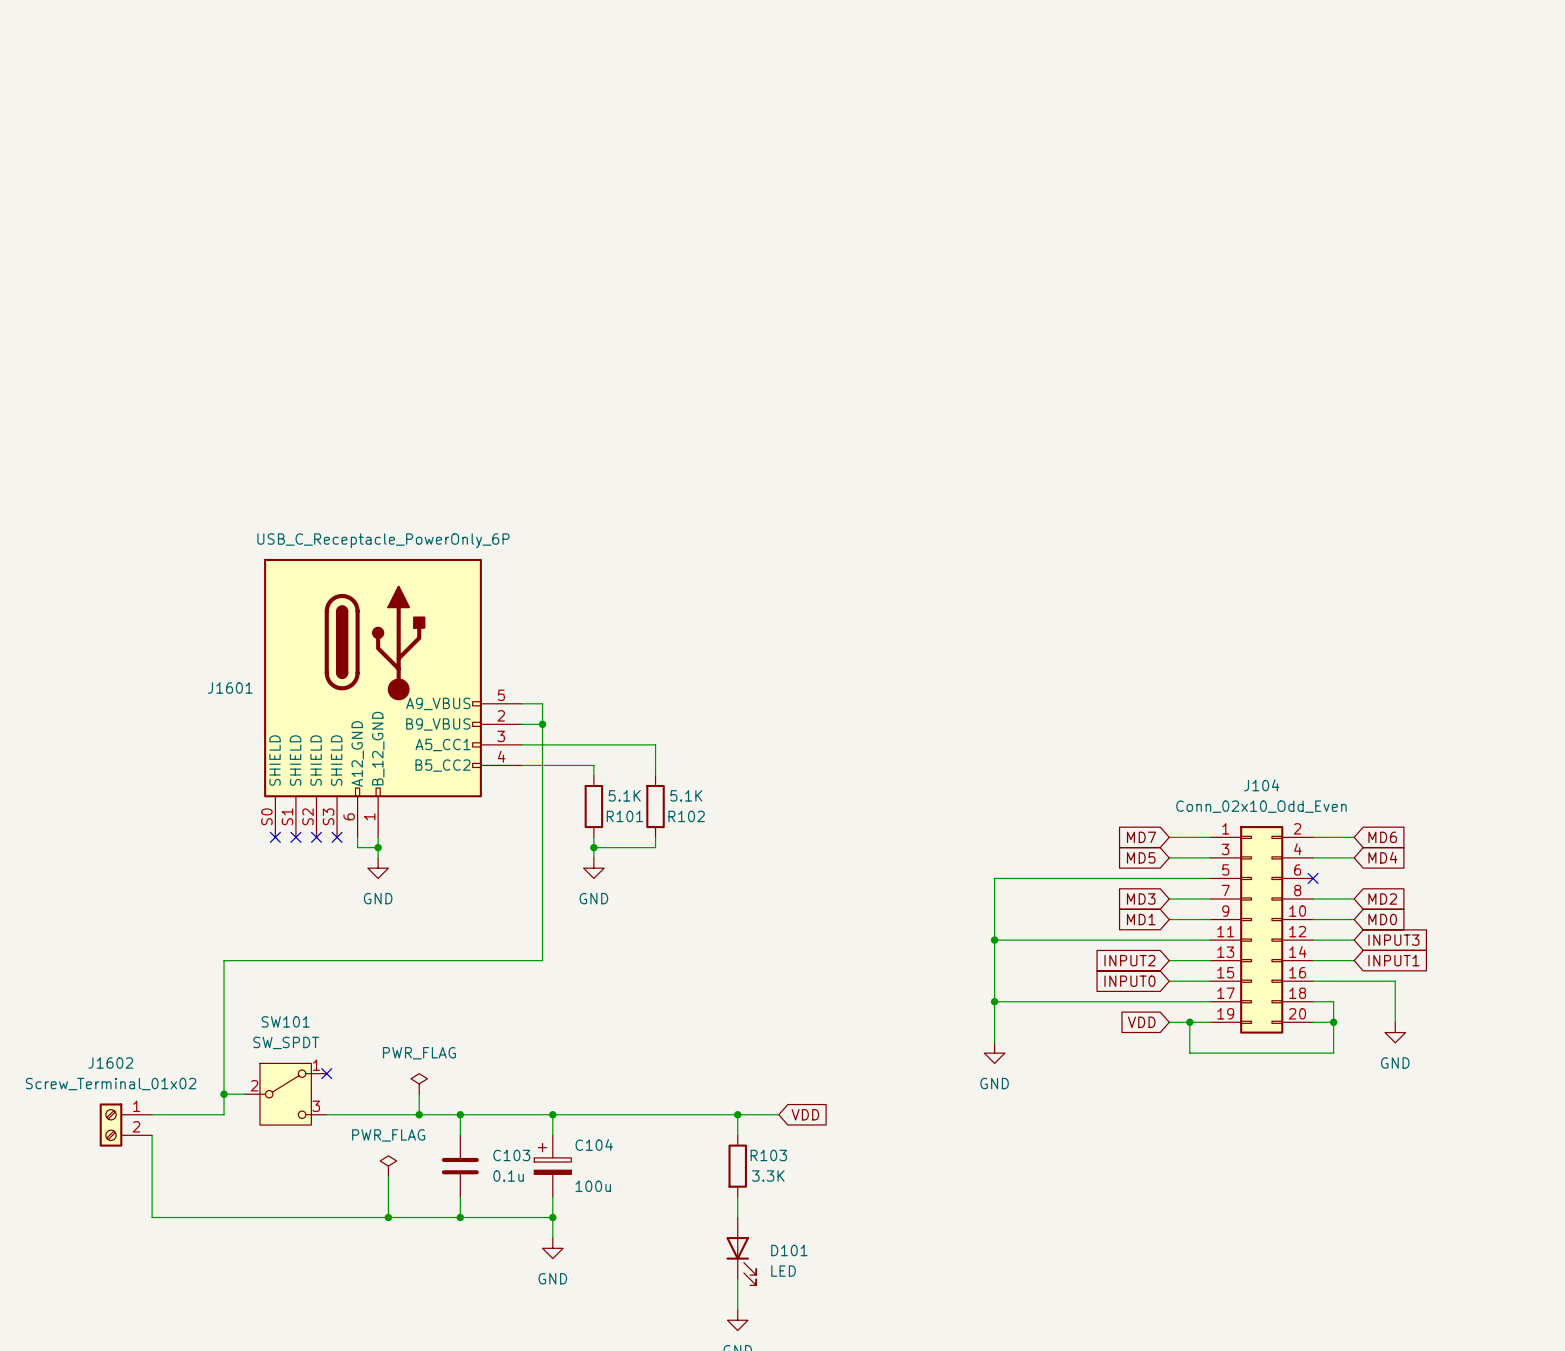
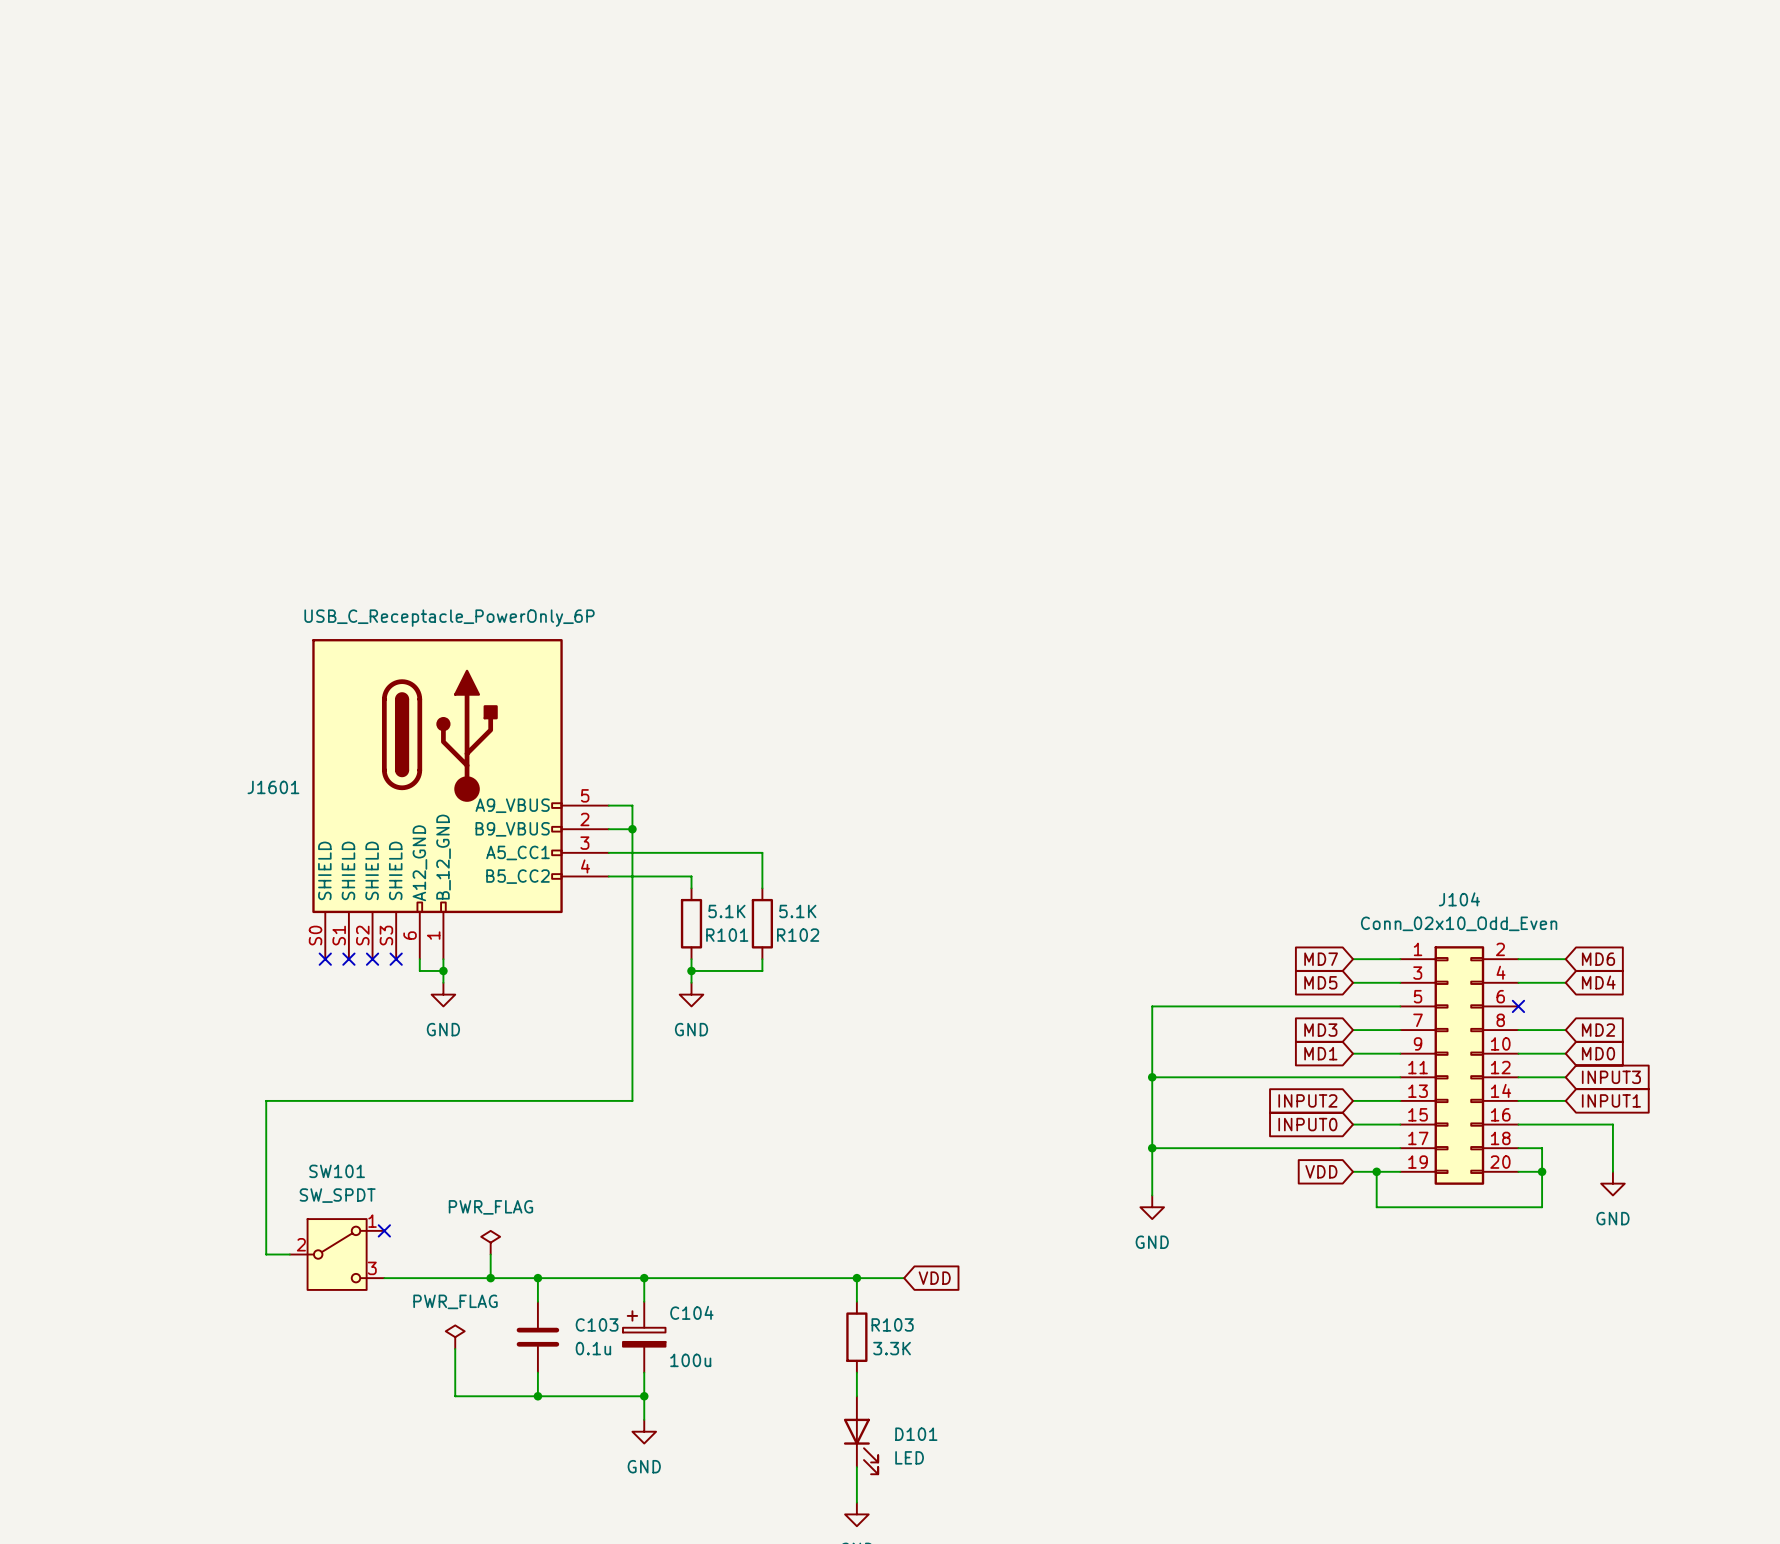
wire: (224, 1094) (224, 1114) (152, 1114) -> none
junction: (224, 1094) -> none
J1602: Screw_Terminal_01x02 (125, 1125) -> none
wire: (152, 1135) (152, 1217) (388, 1217) -> none
junction: (388, 1217) -> none

